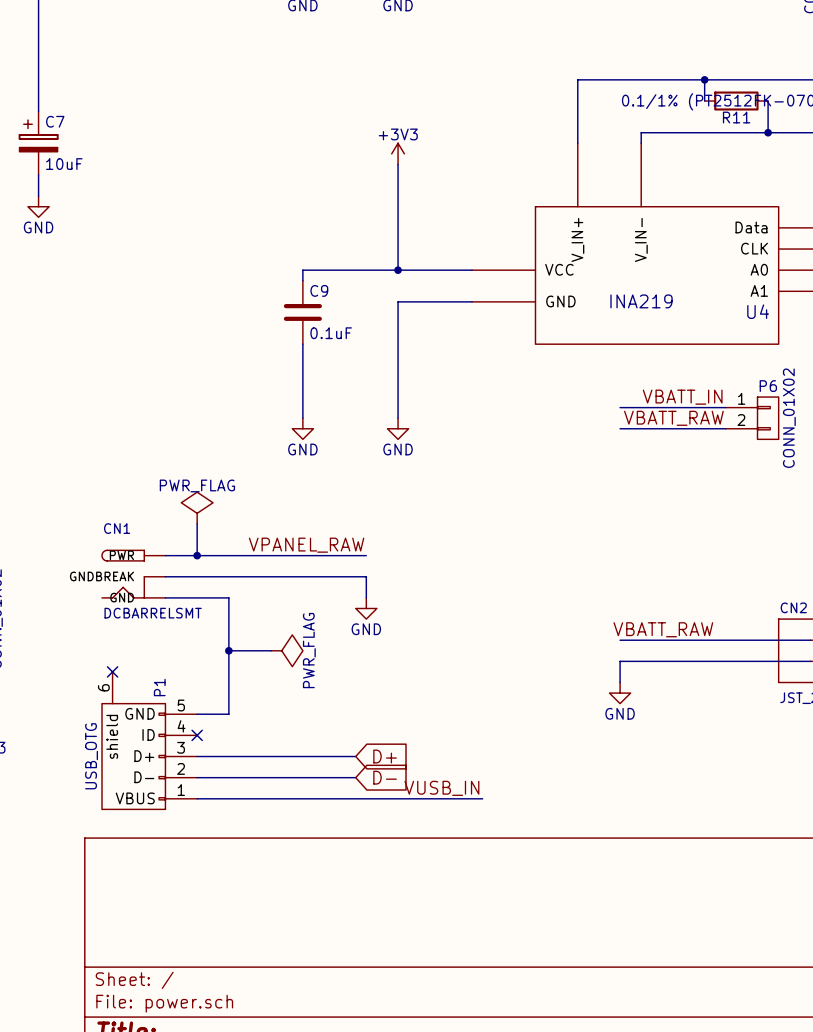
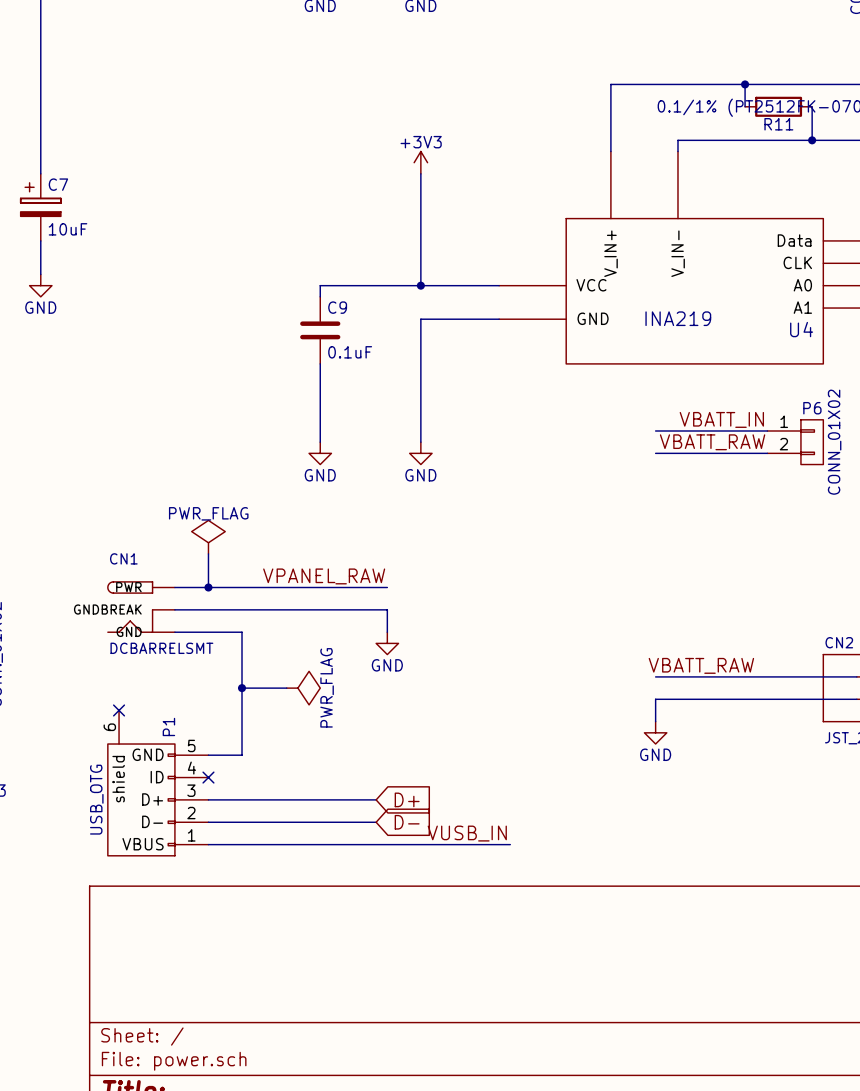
C7 position: (38, 143) -> (40, 207)
power symbol position: GND (38, 206) -> GND (40, 285)
wire: none -> (40, 240) (40, 274)

